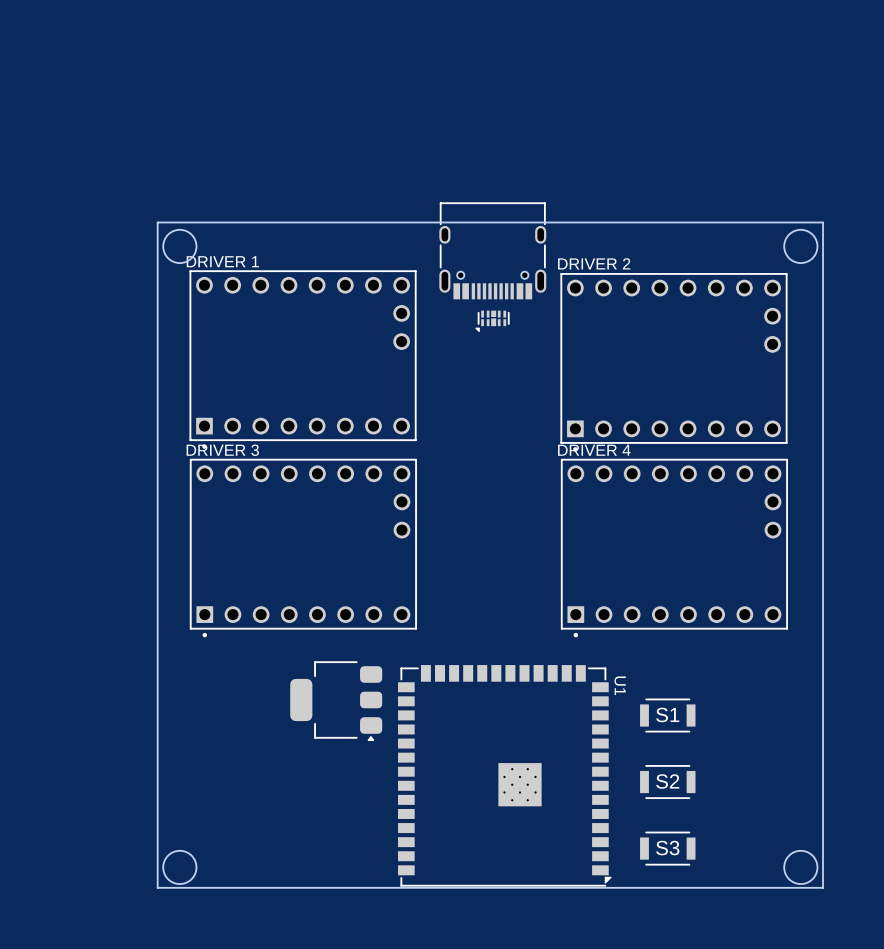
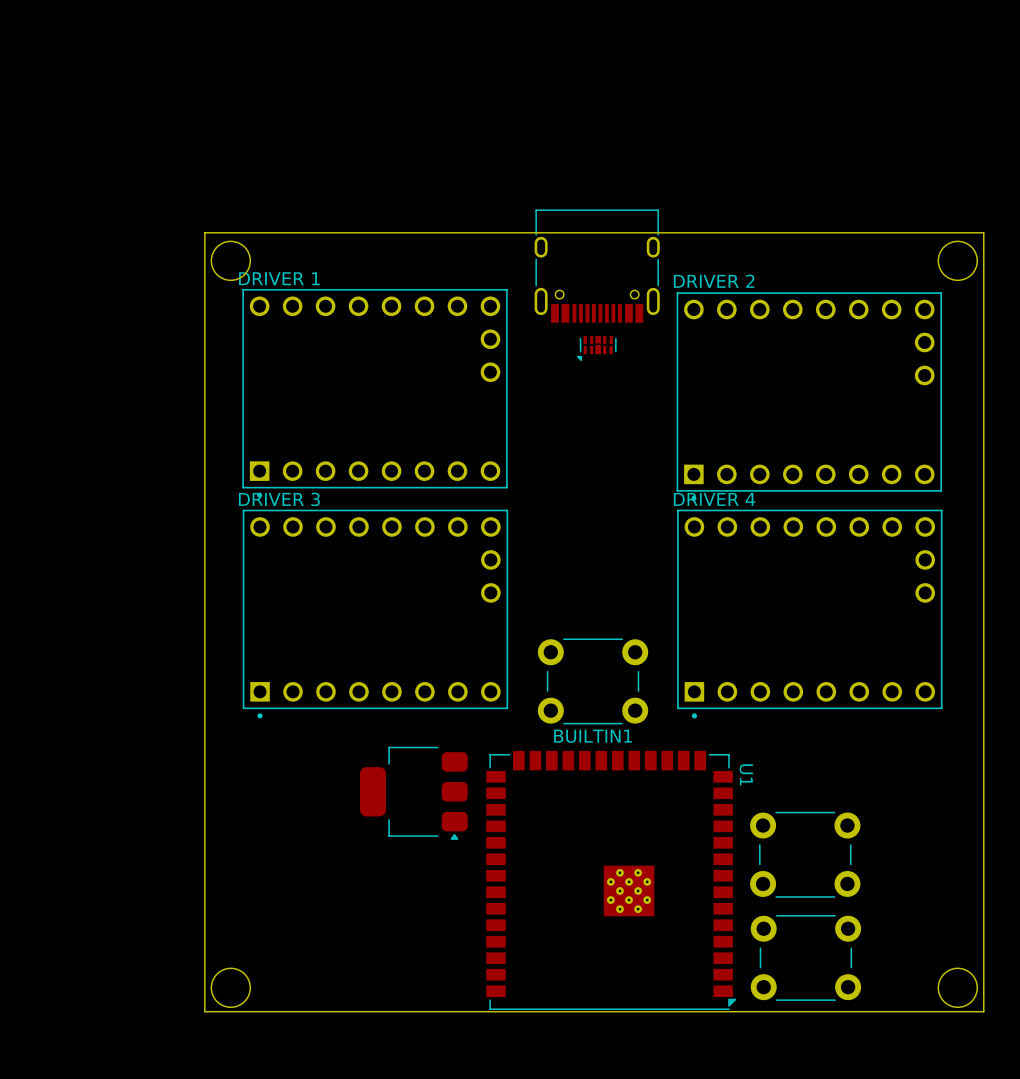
BUILTIN1: none -> (593, 681)
S1: (667, 715) -> none
part: none -> (805, 854)
S2: (667, 782) -> none
part: none -> (805, 957)
S3: (667, 848) -> none

